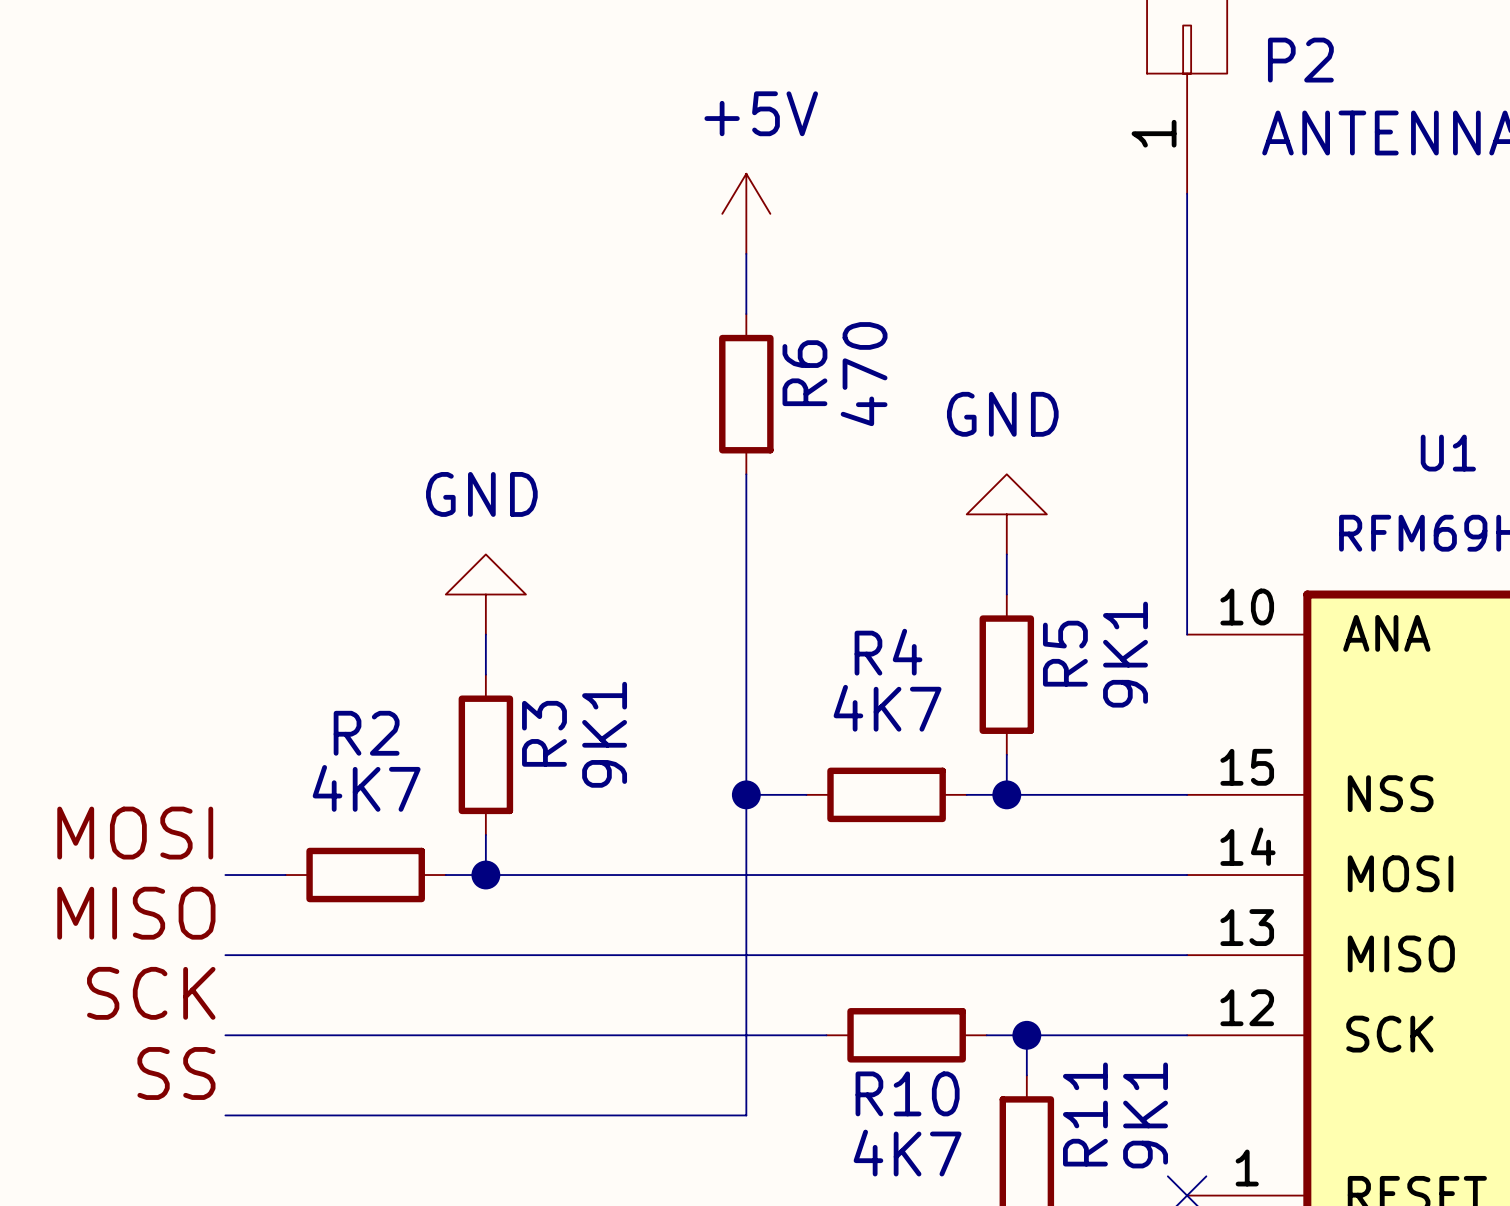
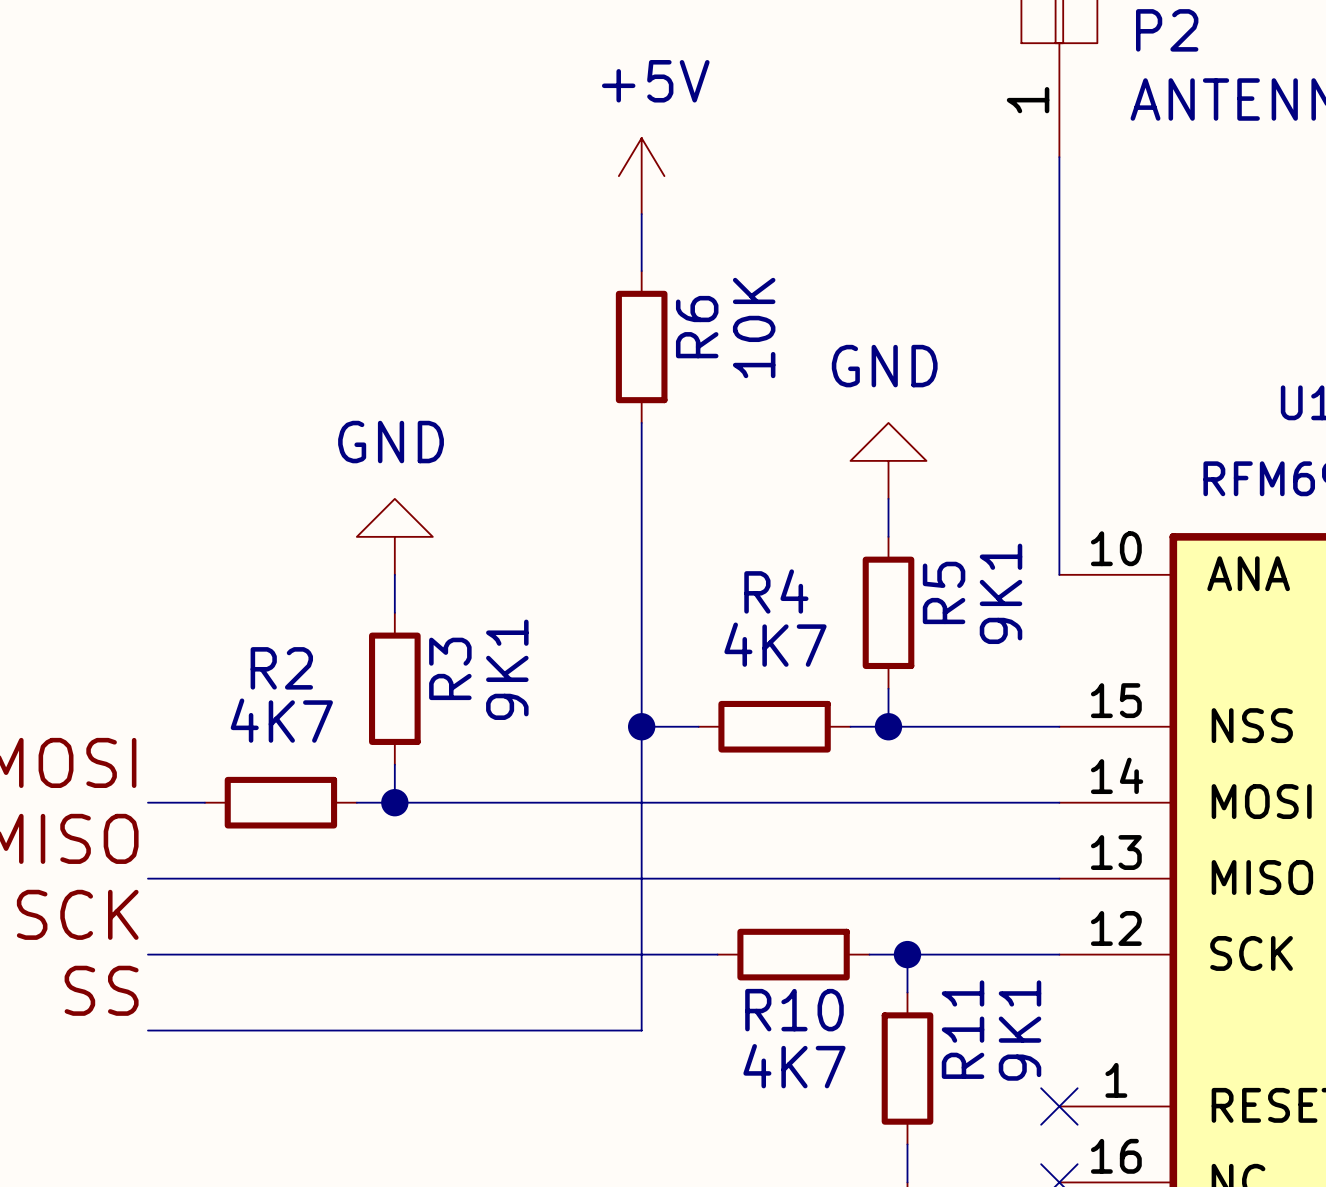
R6 value: 470 (864, 374) -> 10K (754, 328)

